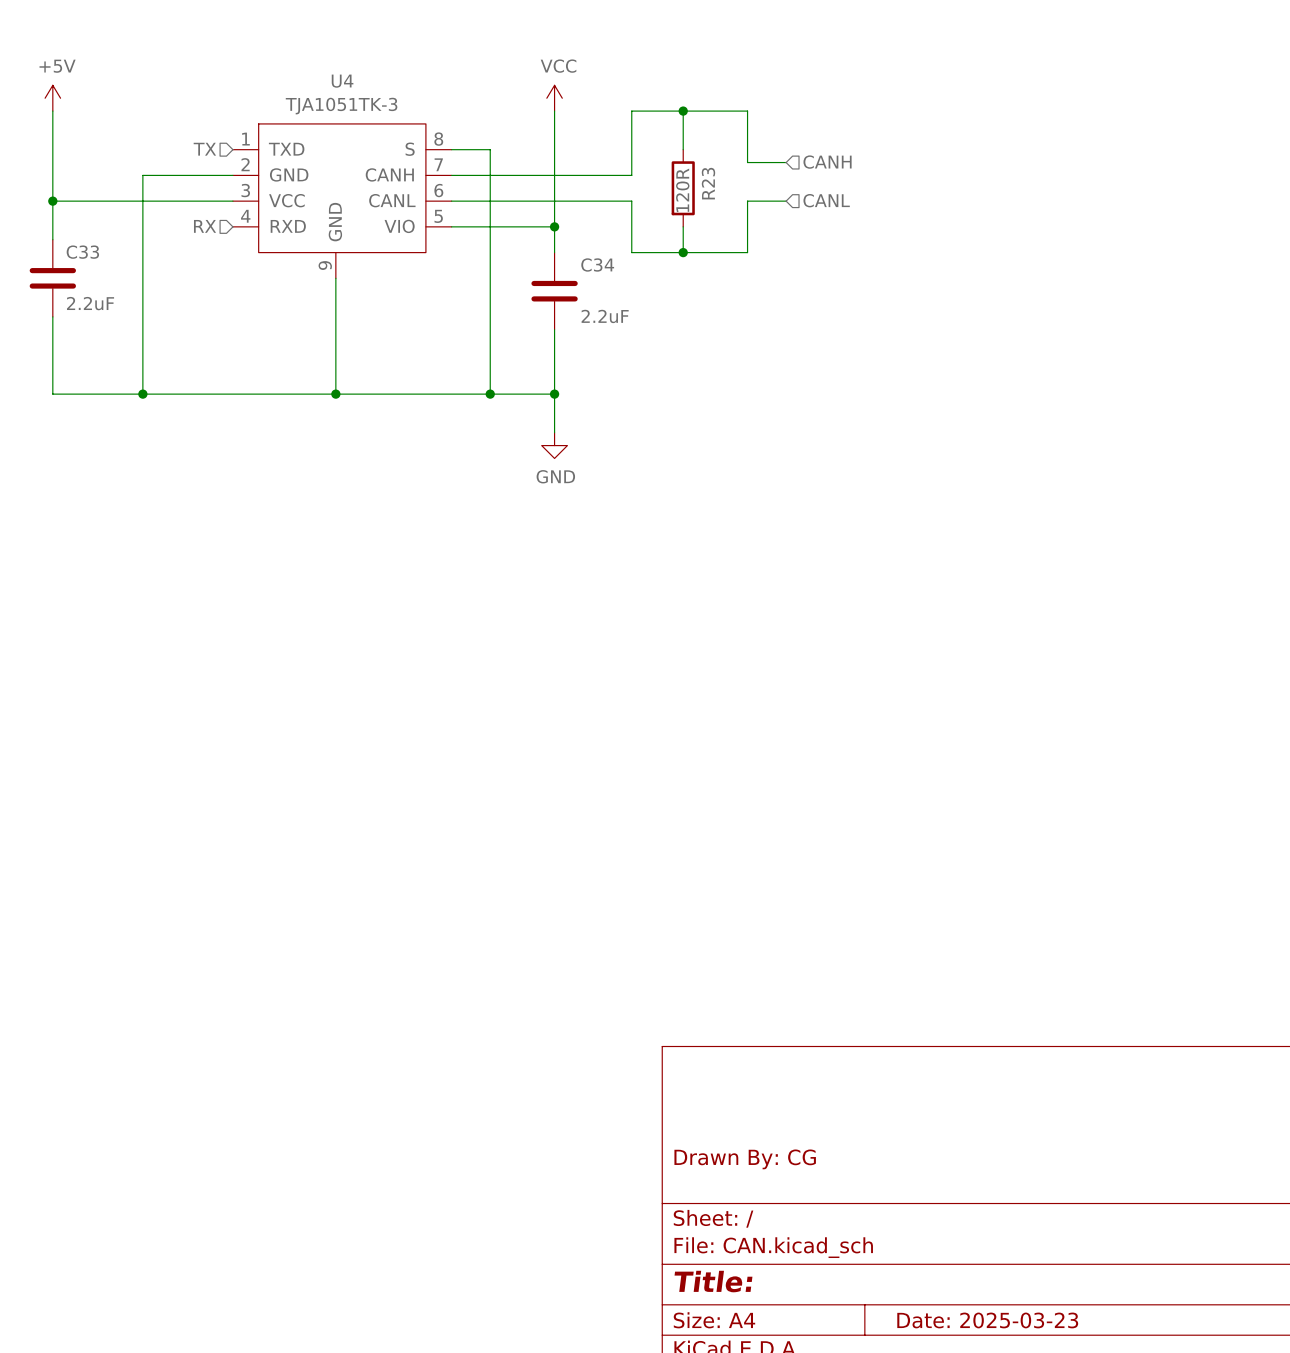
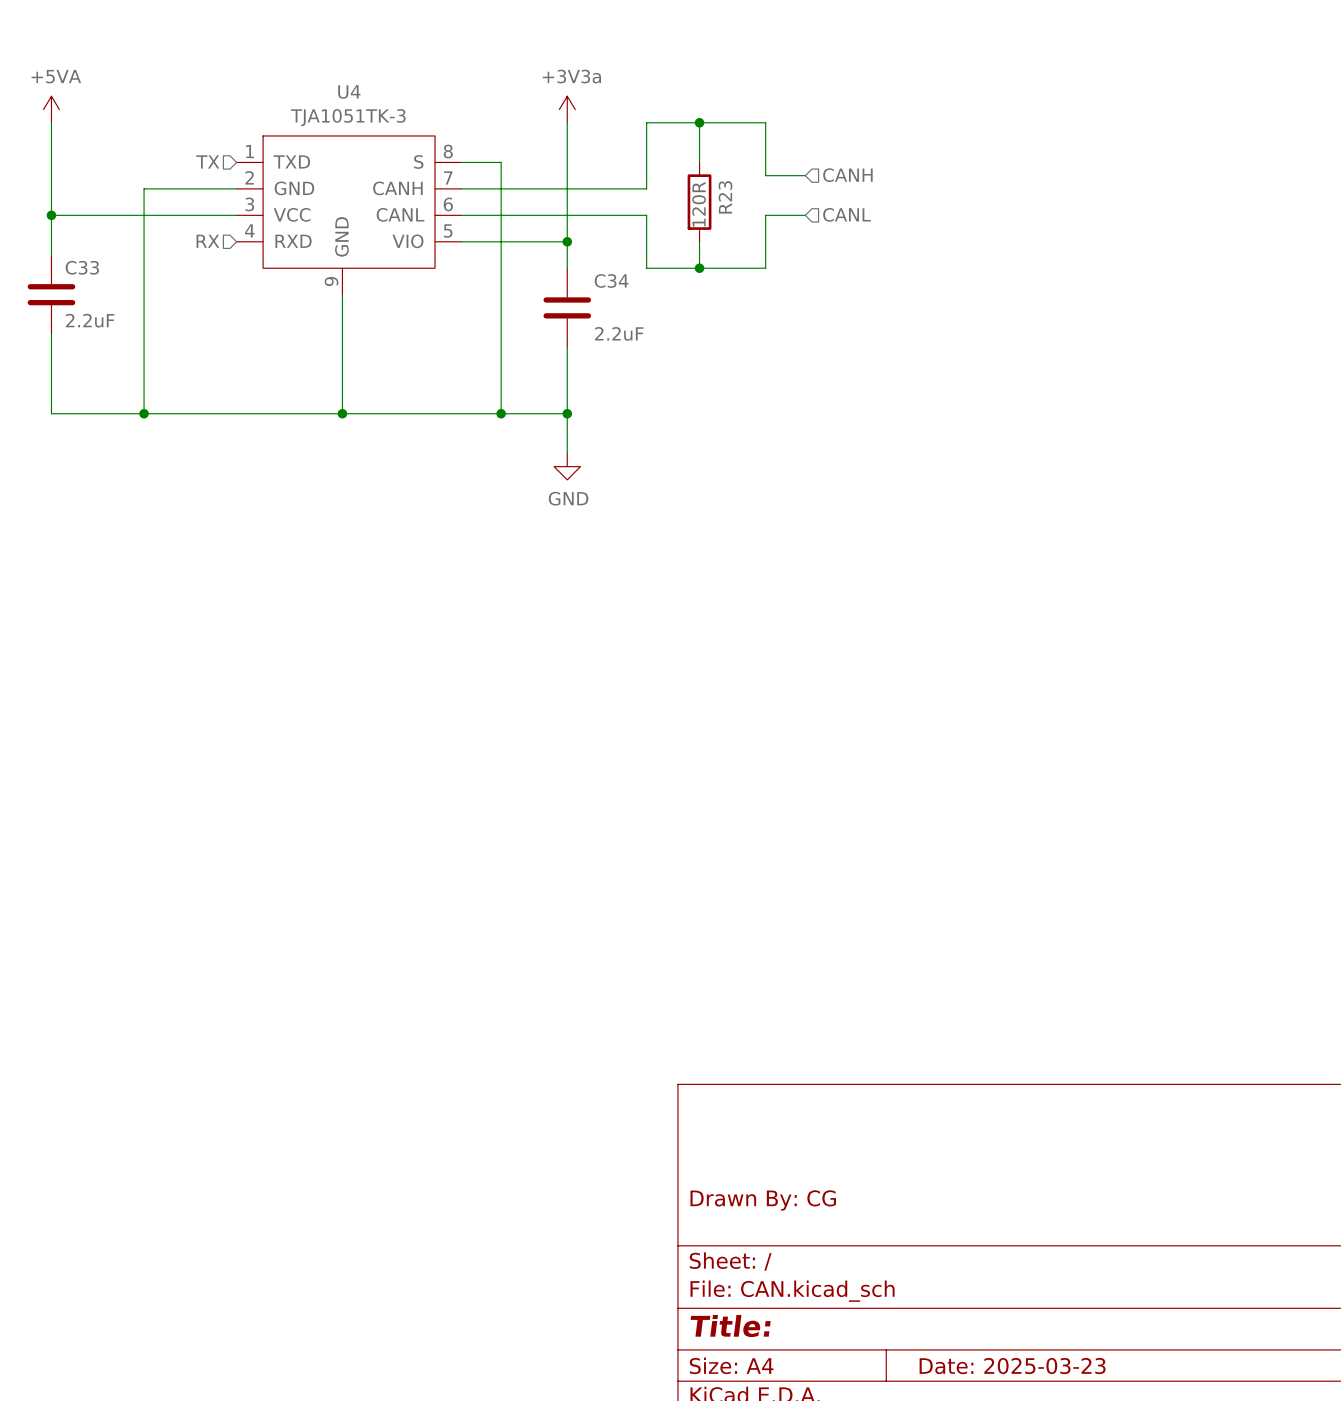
power symbol: +5V (52, 98) -> +5VA (51, 109)
power symbol: VCC (554, 98) -> +3V3a (567, 109)

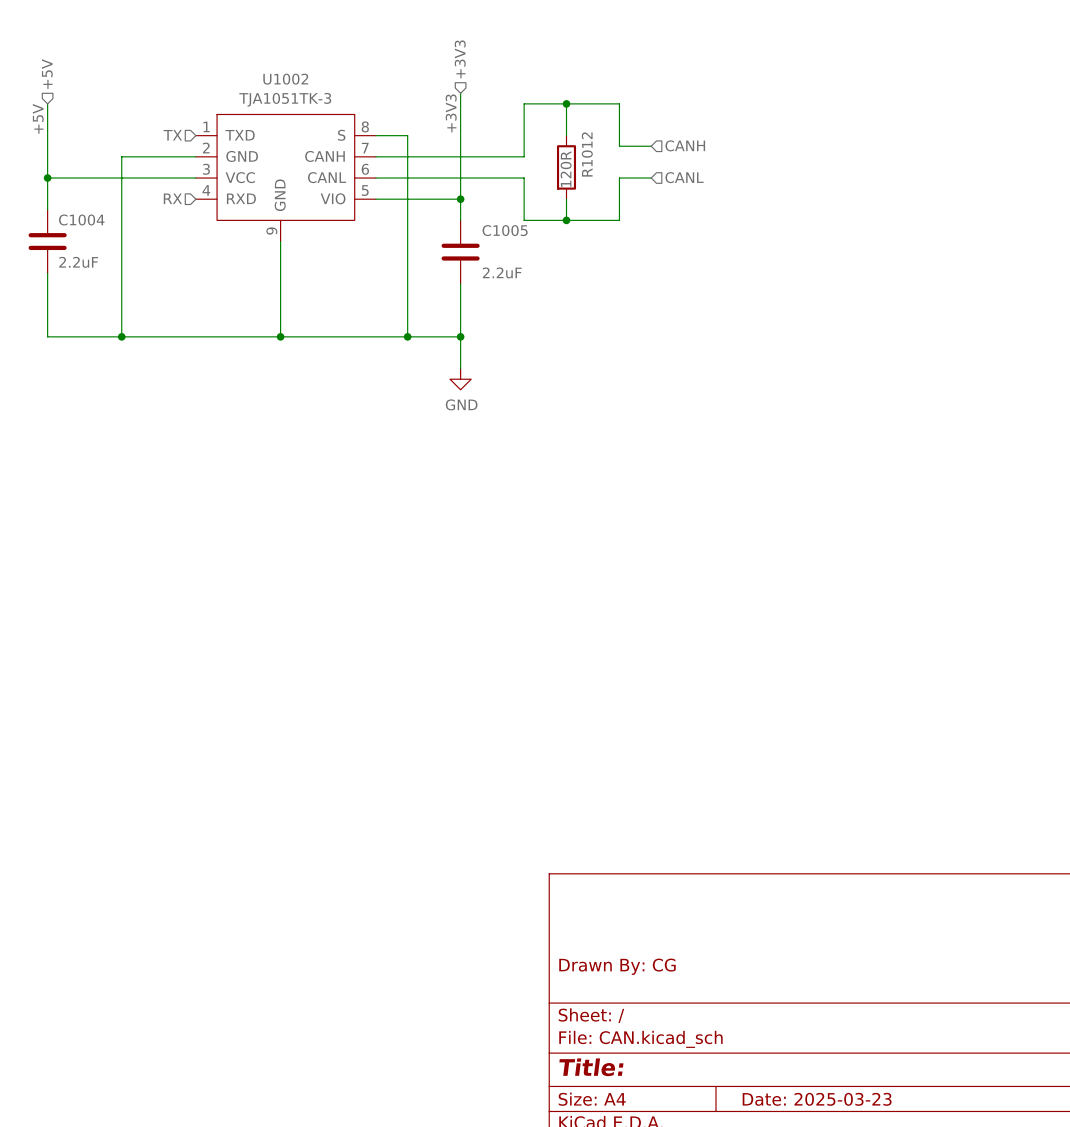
hierarchical label: none -> +3V3 (460, 59)
hierarchical label: none -> +5V (47, 74)
U4 name: U4 (349, 91) -> U1002 (285, 79)
power symbol: +5VA (51, 109) -> none
power symbol: +3V3a (567, 109) -> none
label: none -> +3V3 (451, 113)
label: none -> +5V (38, 118)
R23 name: R23 (725, 197) -> R1012 (587, 154)
C33 name: C33 (82, 267) -> C1004 (81, 219)
C34 name: C34 (611, 280) -> C1005 (505, 230)

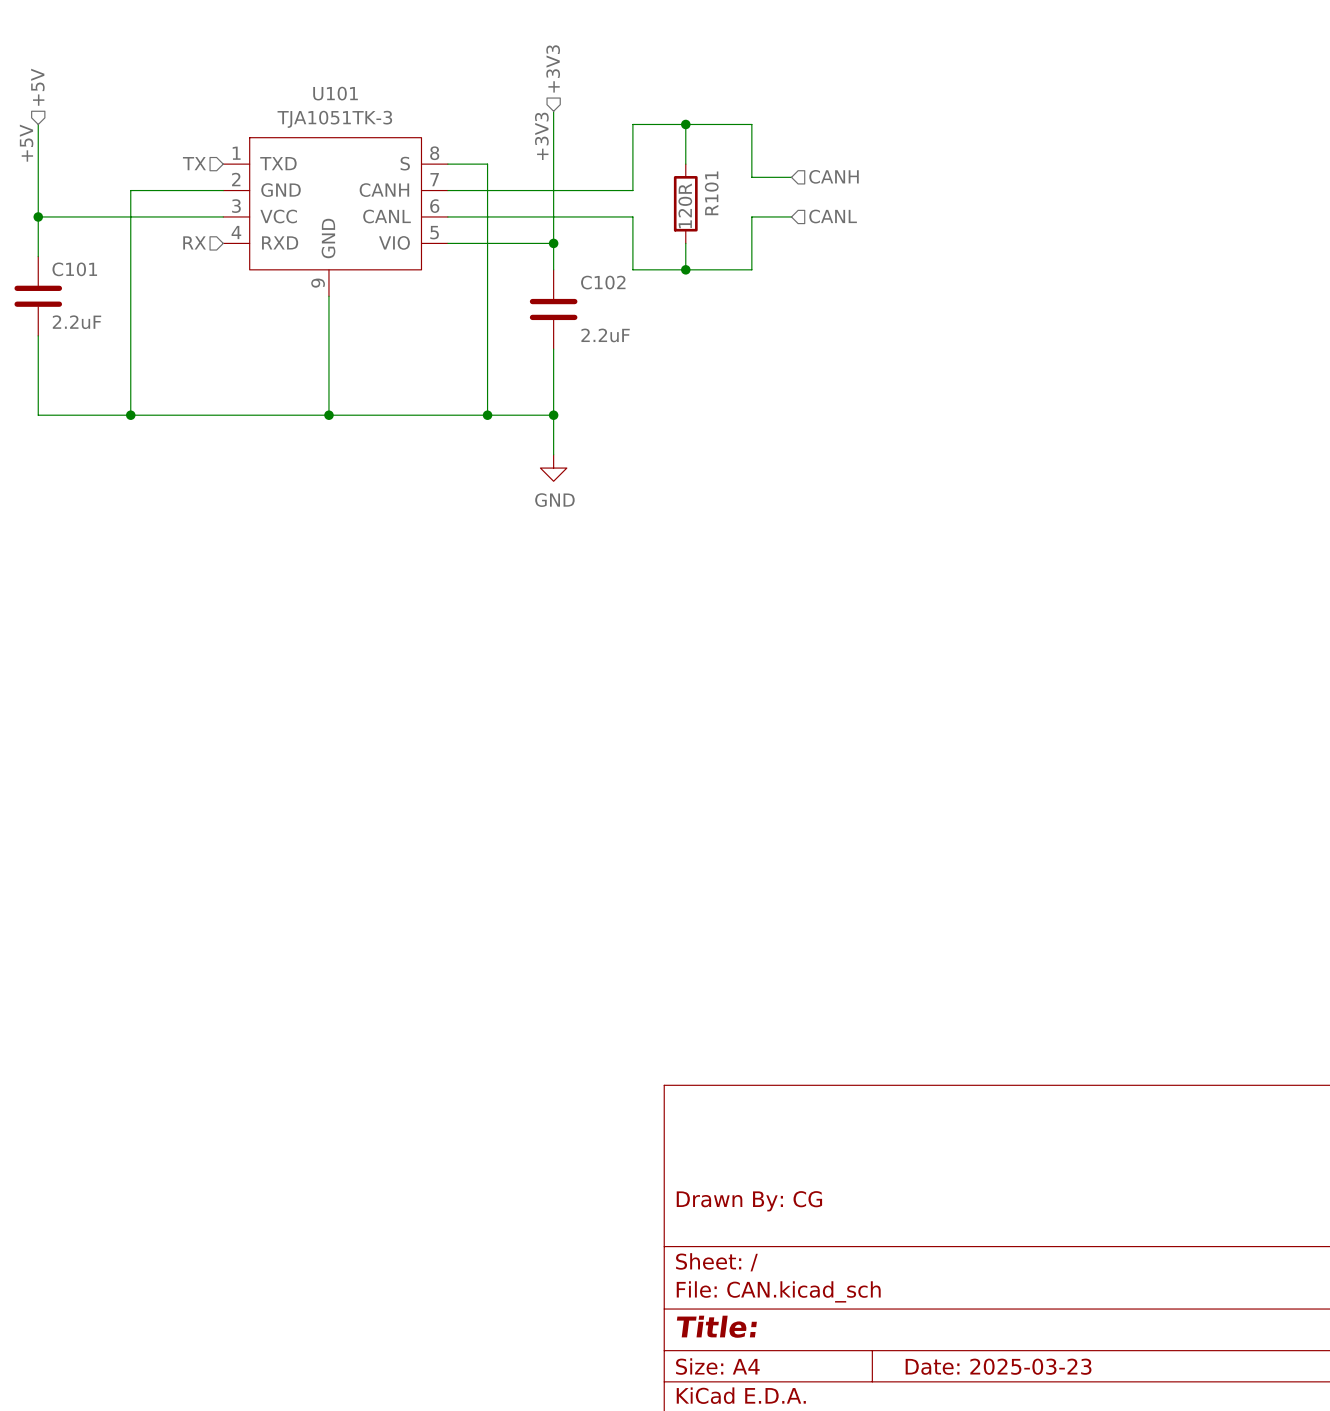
U1002 name: U1002 (285, 79) -> U101 (335, 93)
R1012 name: R1012 (587, 154) -> R101 (711, 193)
C1004 name: C1004 (81, 219) -> C101 (74, 269)
C1005 name: C1005 (505, 230) -> C102 (603, 282)

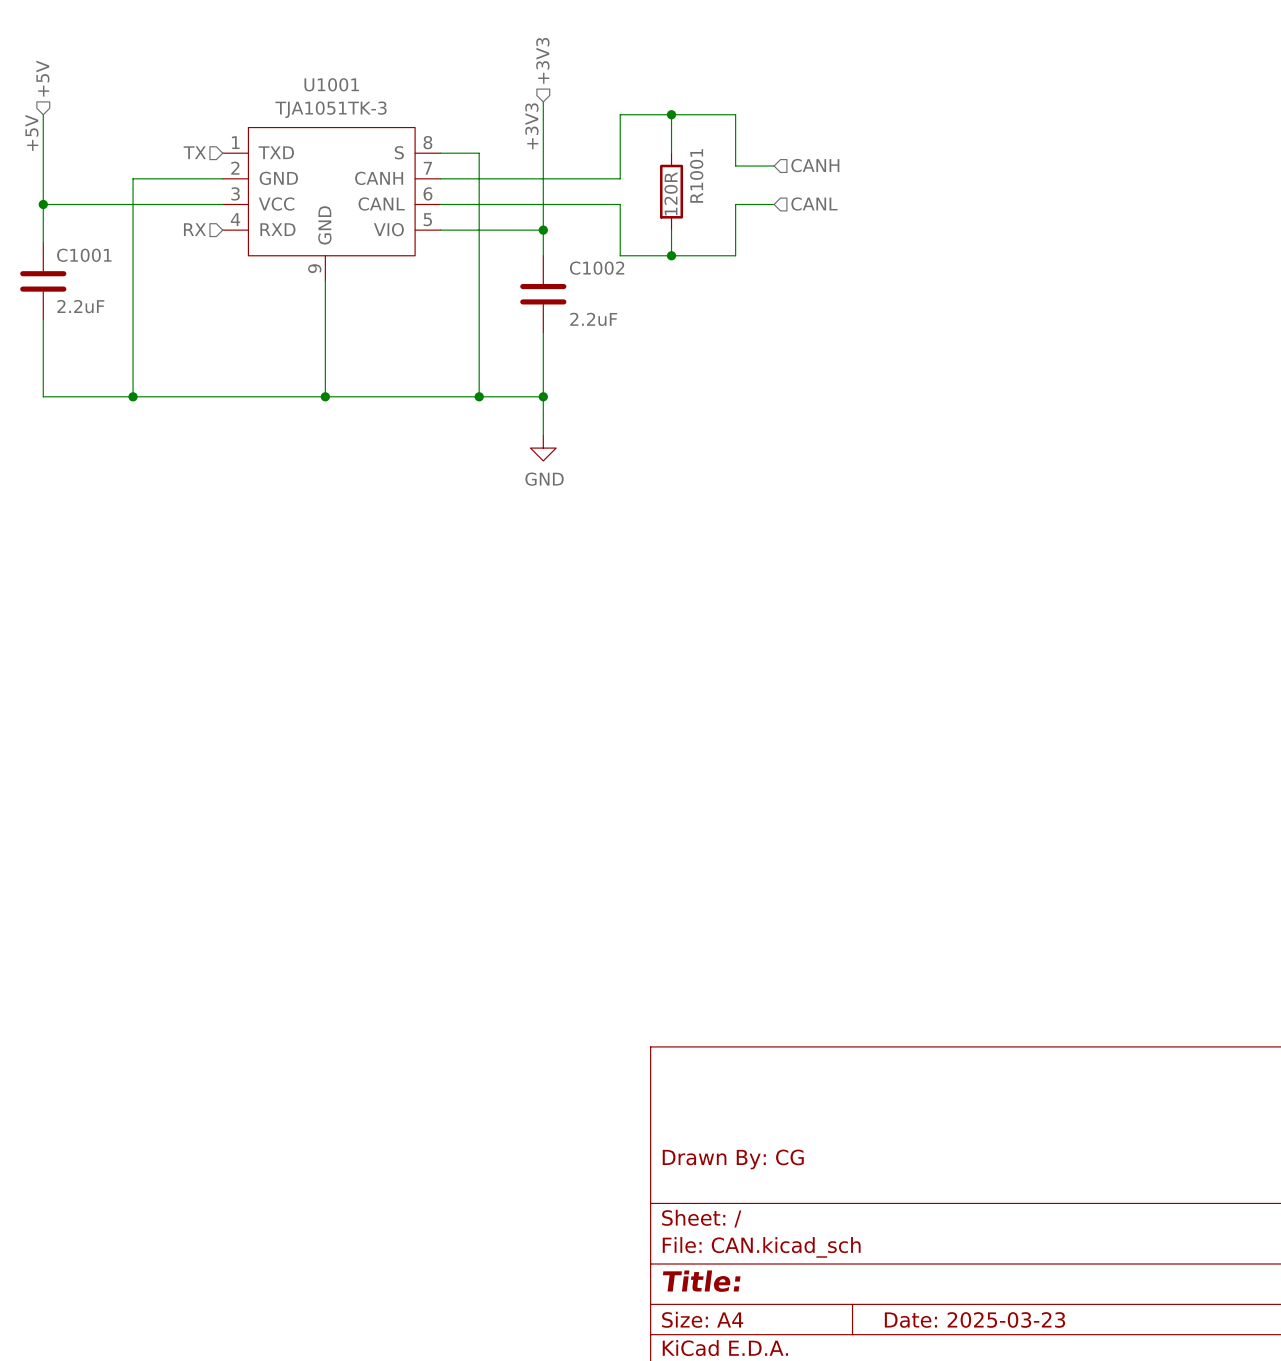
U101 name: U101 (335, 93) -> U1001 (331, 84)
R101 name: R101 (711, 193) -> R1001 (696, 175)
C101 name: C101 (74, 269) -> C1001 (84, 255)
C102 name: C102 (603, 282) -> C1002 (597, 268)

